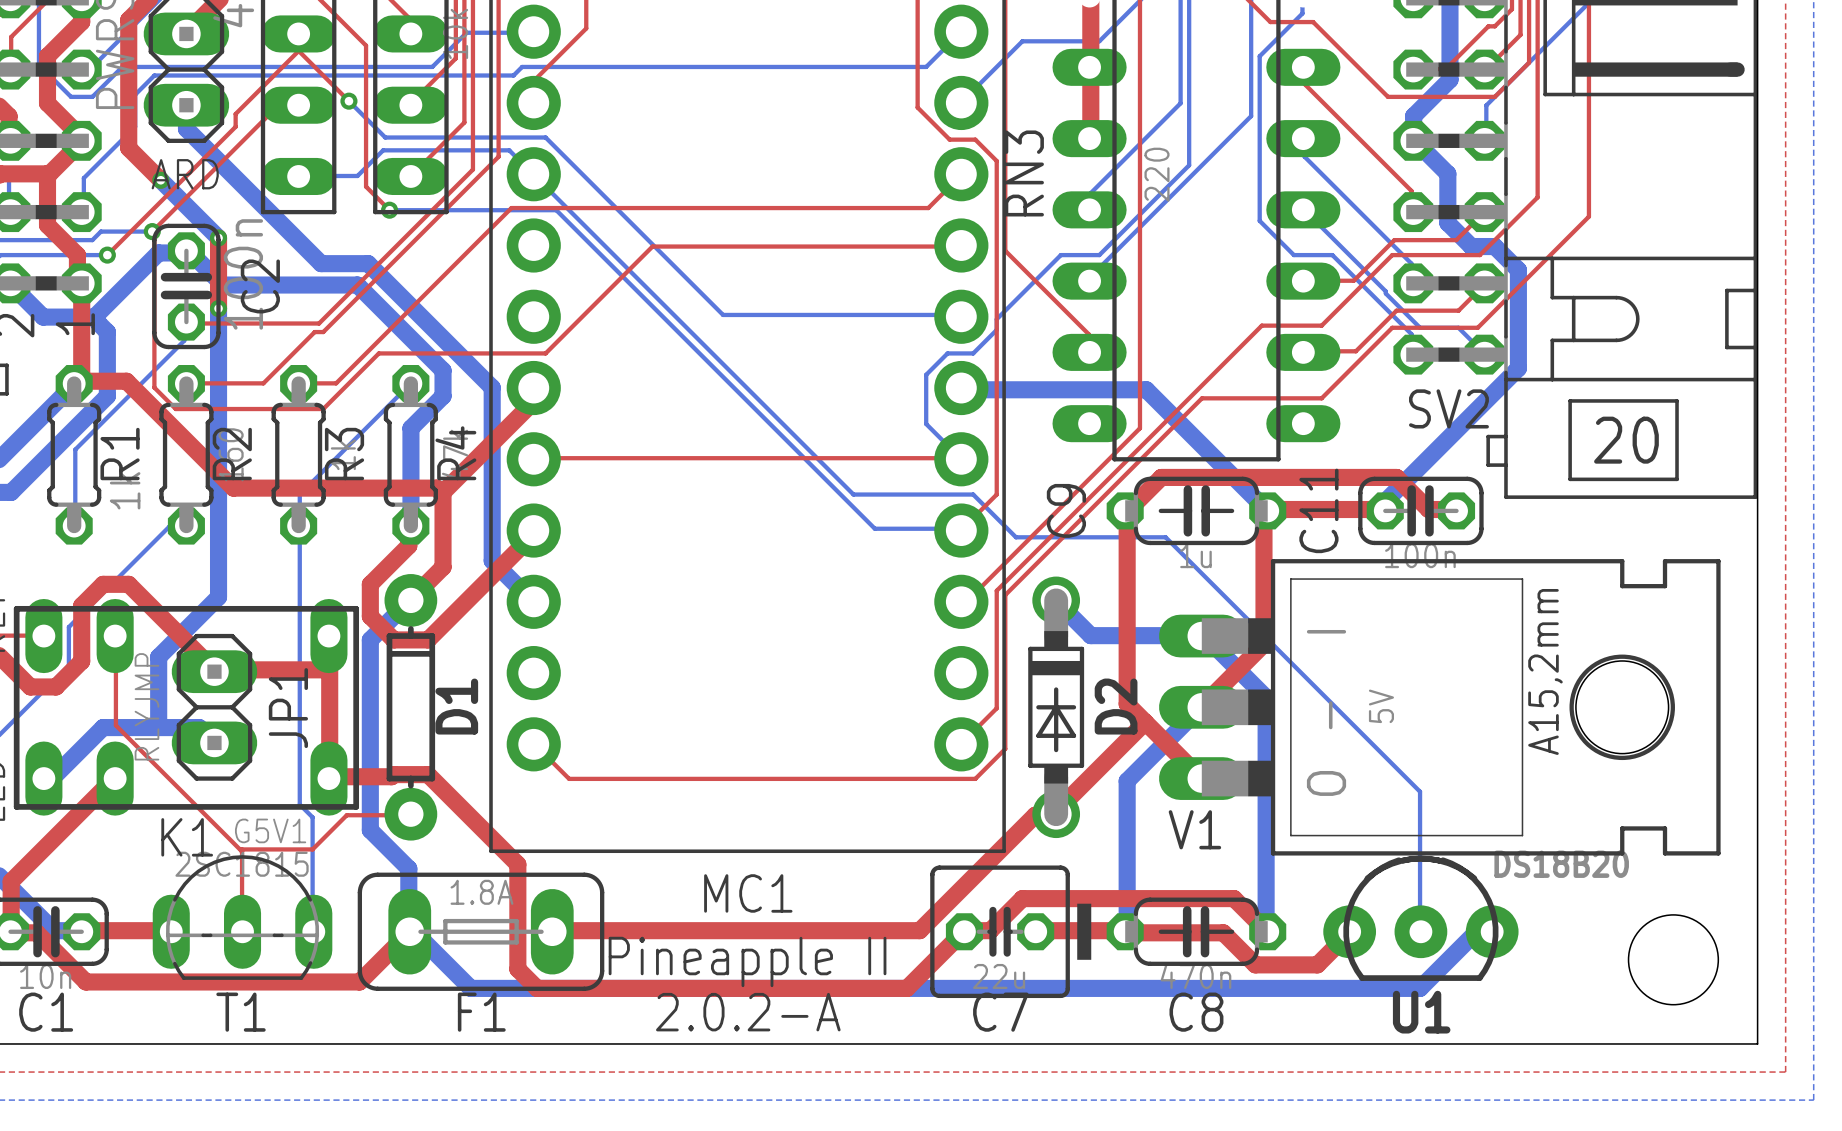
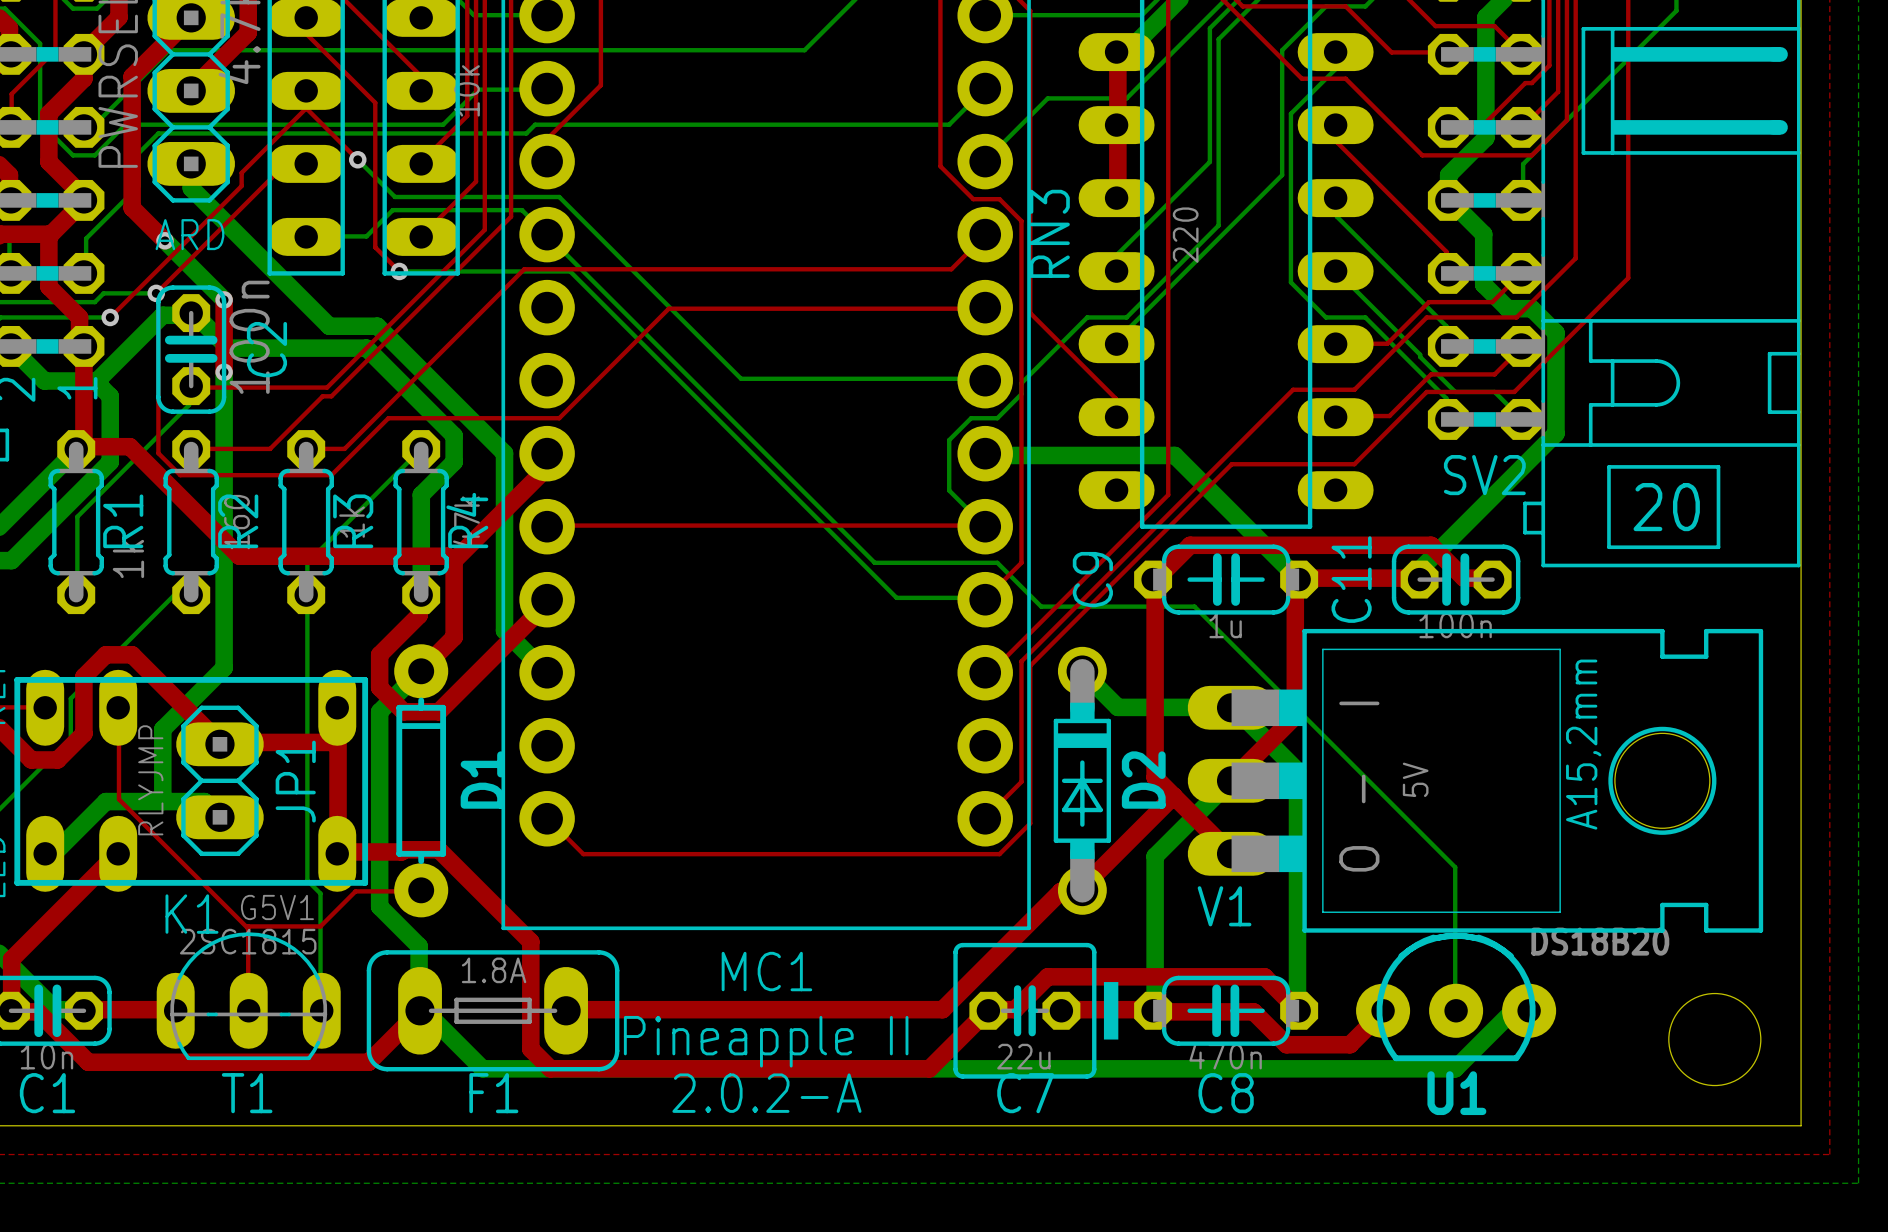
D1 name position: D1 (456, 706) -> D1 (482, 780)

